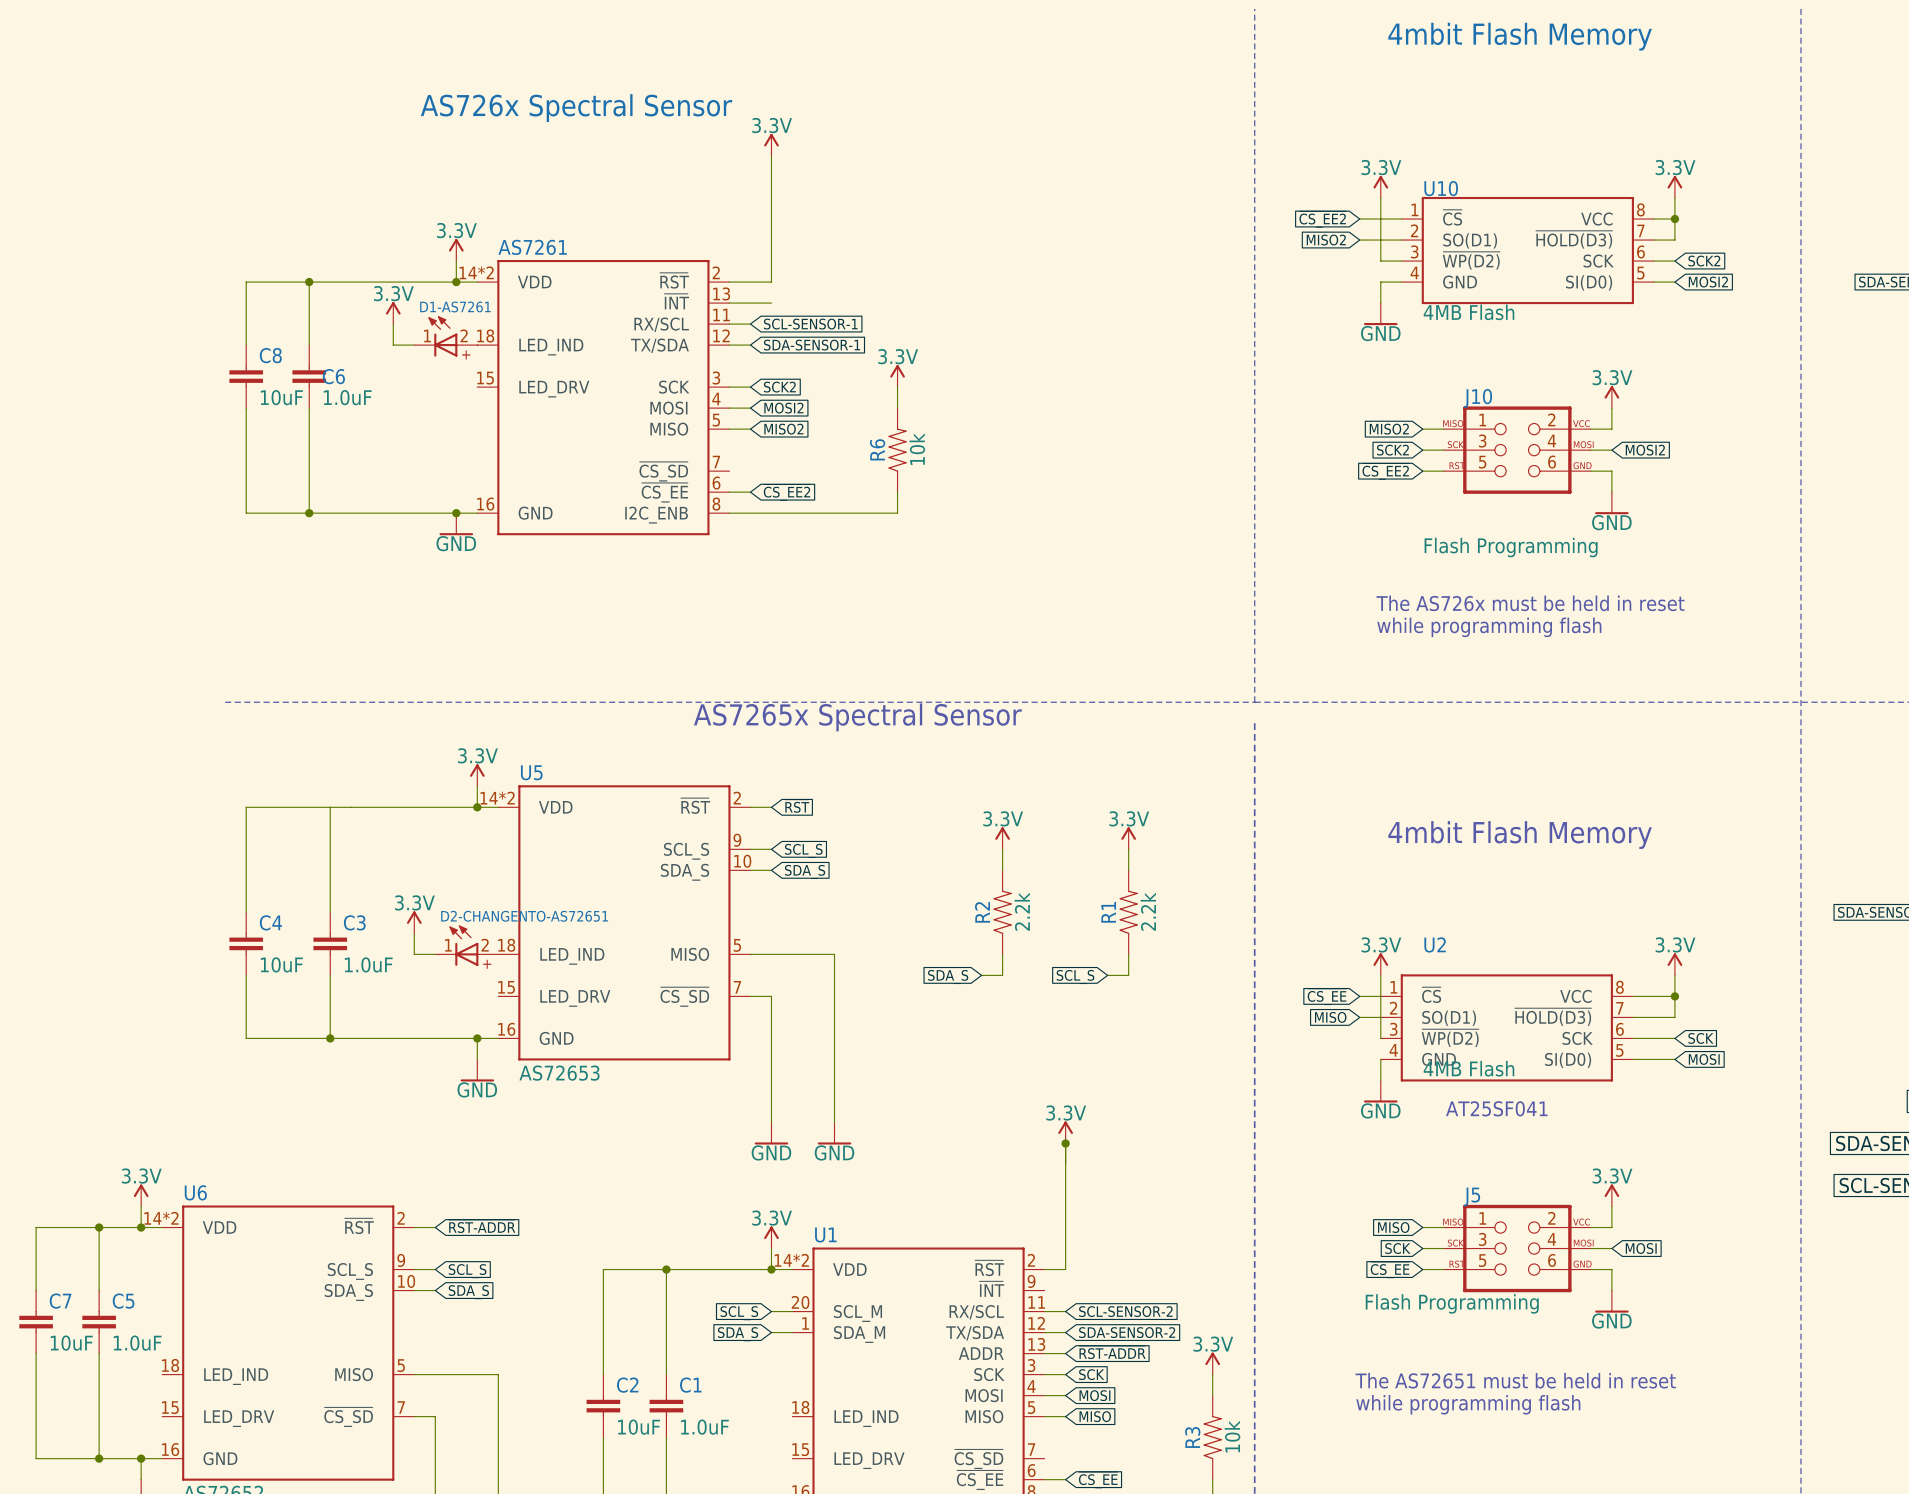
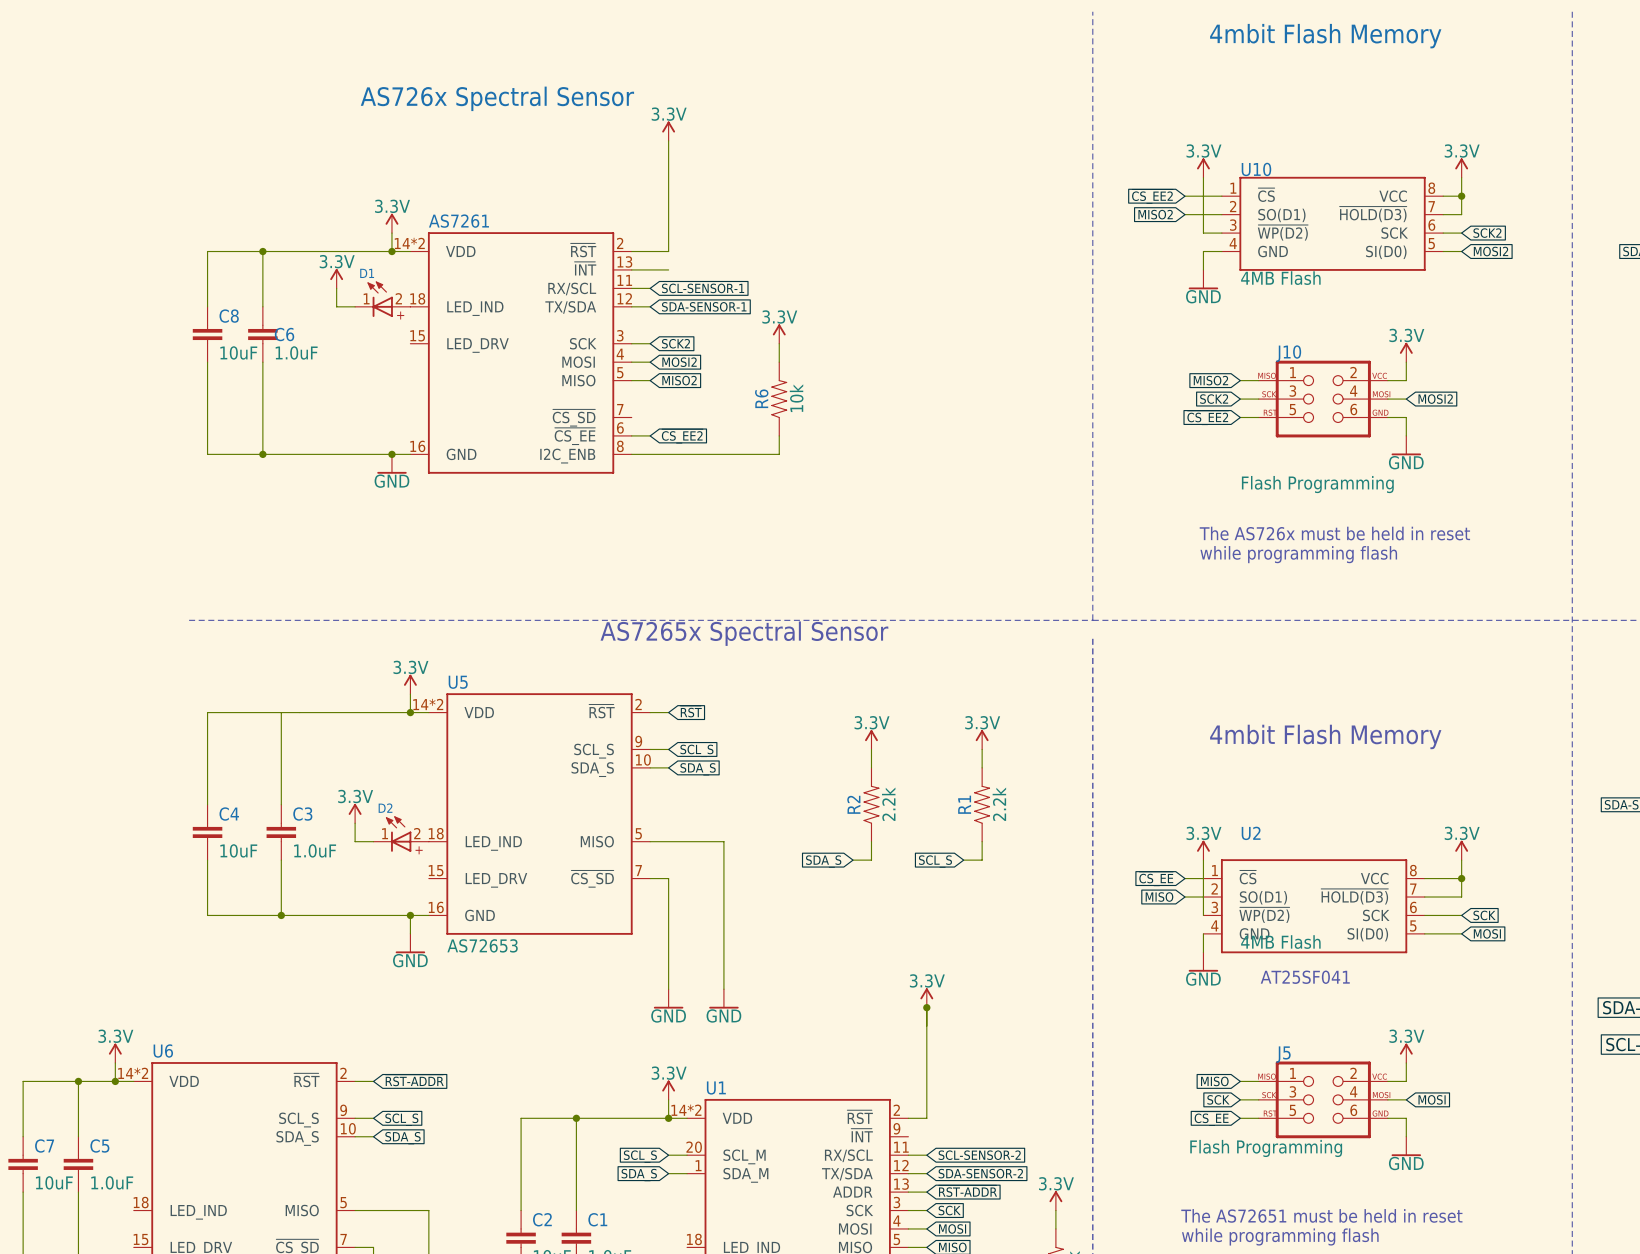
D1-AS7261 name: D1-AS7261 (455, 306) -> D1 (367, 273)
D2-CHANGENTO-AS72651 name: D2-CHANGENTO-AS72651 (524, 916) -> D2 (385, 808)

